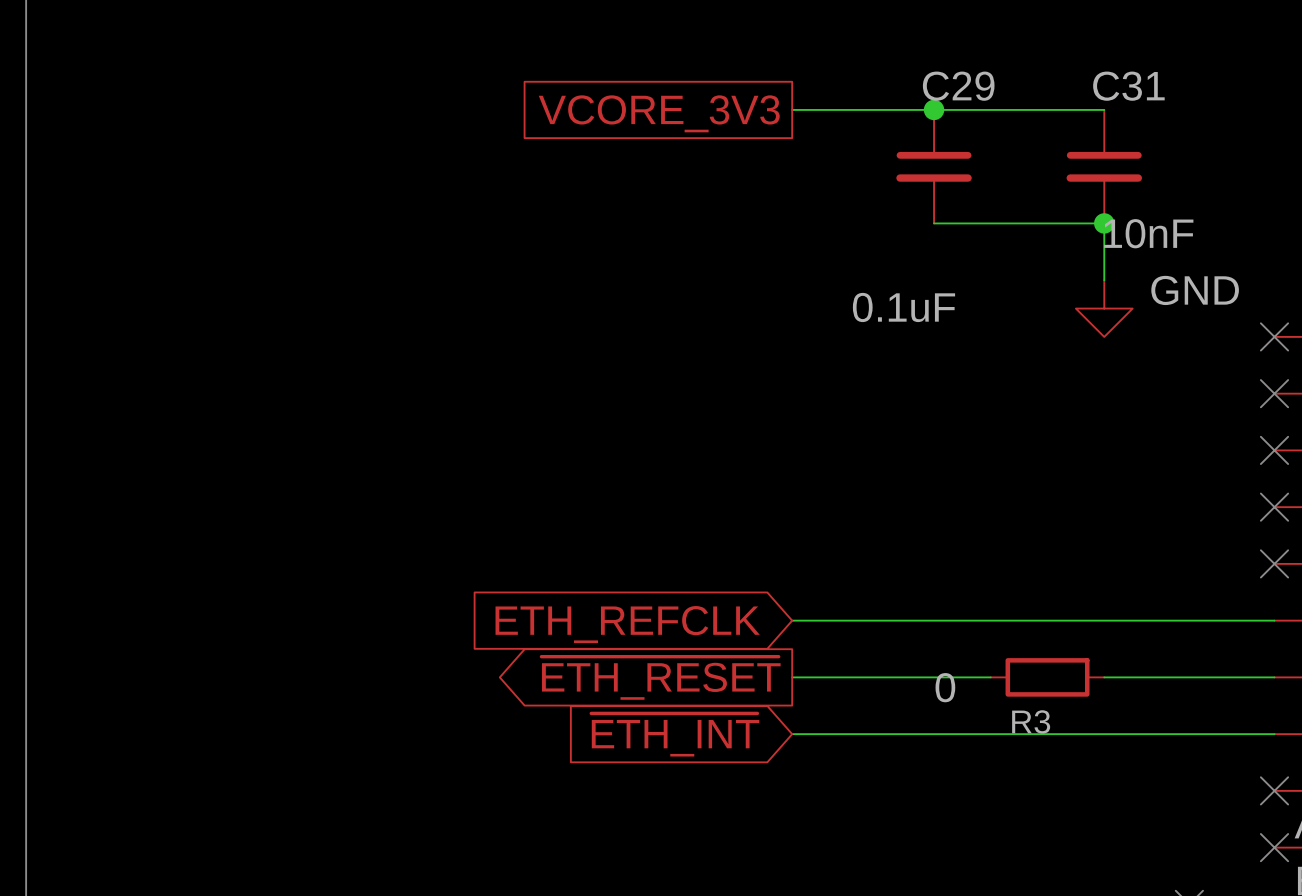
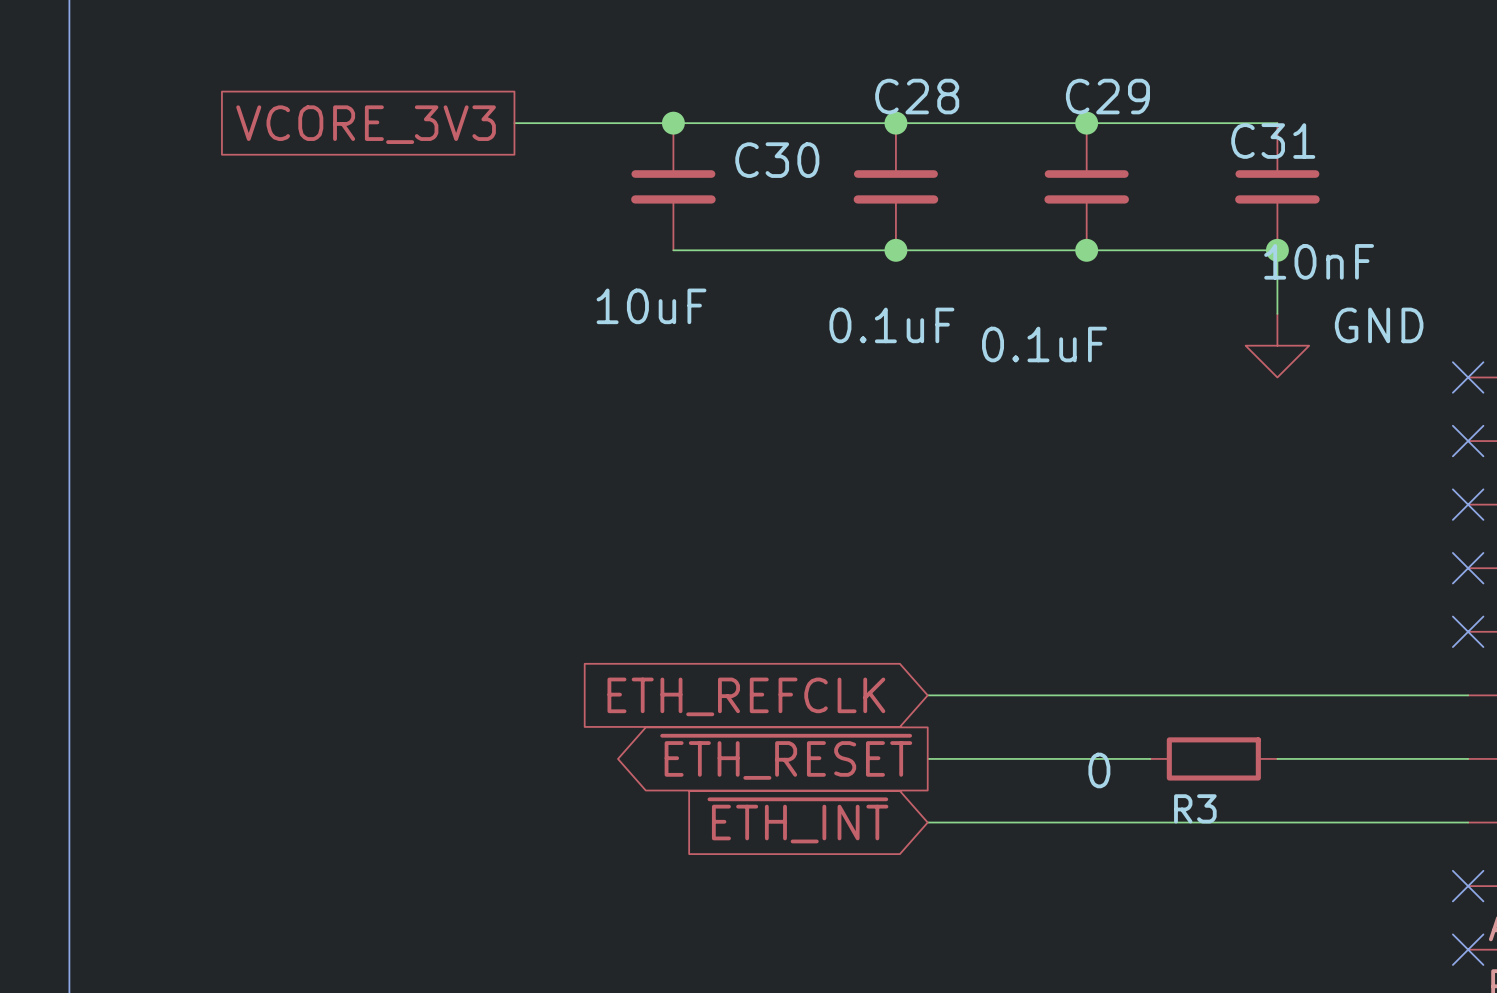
C31 name position: C31 (1128, 86) -> C31 (1273, 141)
wire: none -> (514, 123) (927, 123)
junction: none -> (673, 123)
junction: none -> (895, 123)
global label position: VCORE_3V3 (659, 113) -> VCORE_3V3 (366, 124)
C30: none -> 10uF (673, 186)
C28: none -> 0.1uF (895, 186)
wire: none -> (673, 250) (1086, 250)
junction: none -> (895, 250)
junction: none -> (1086, 250)

